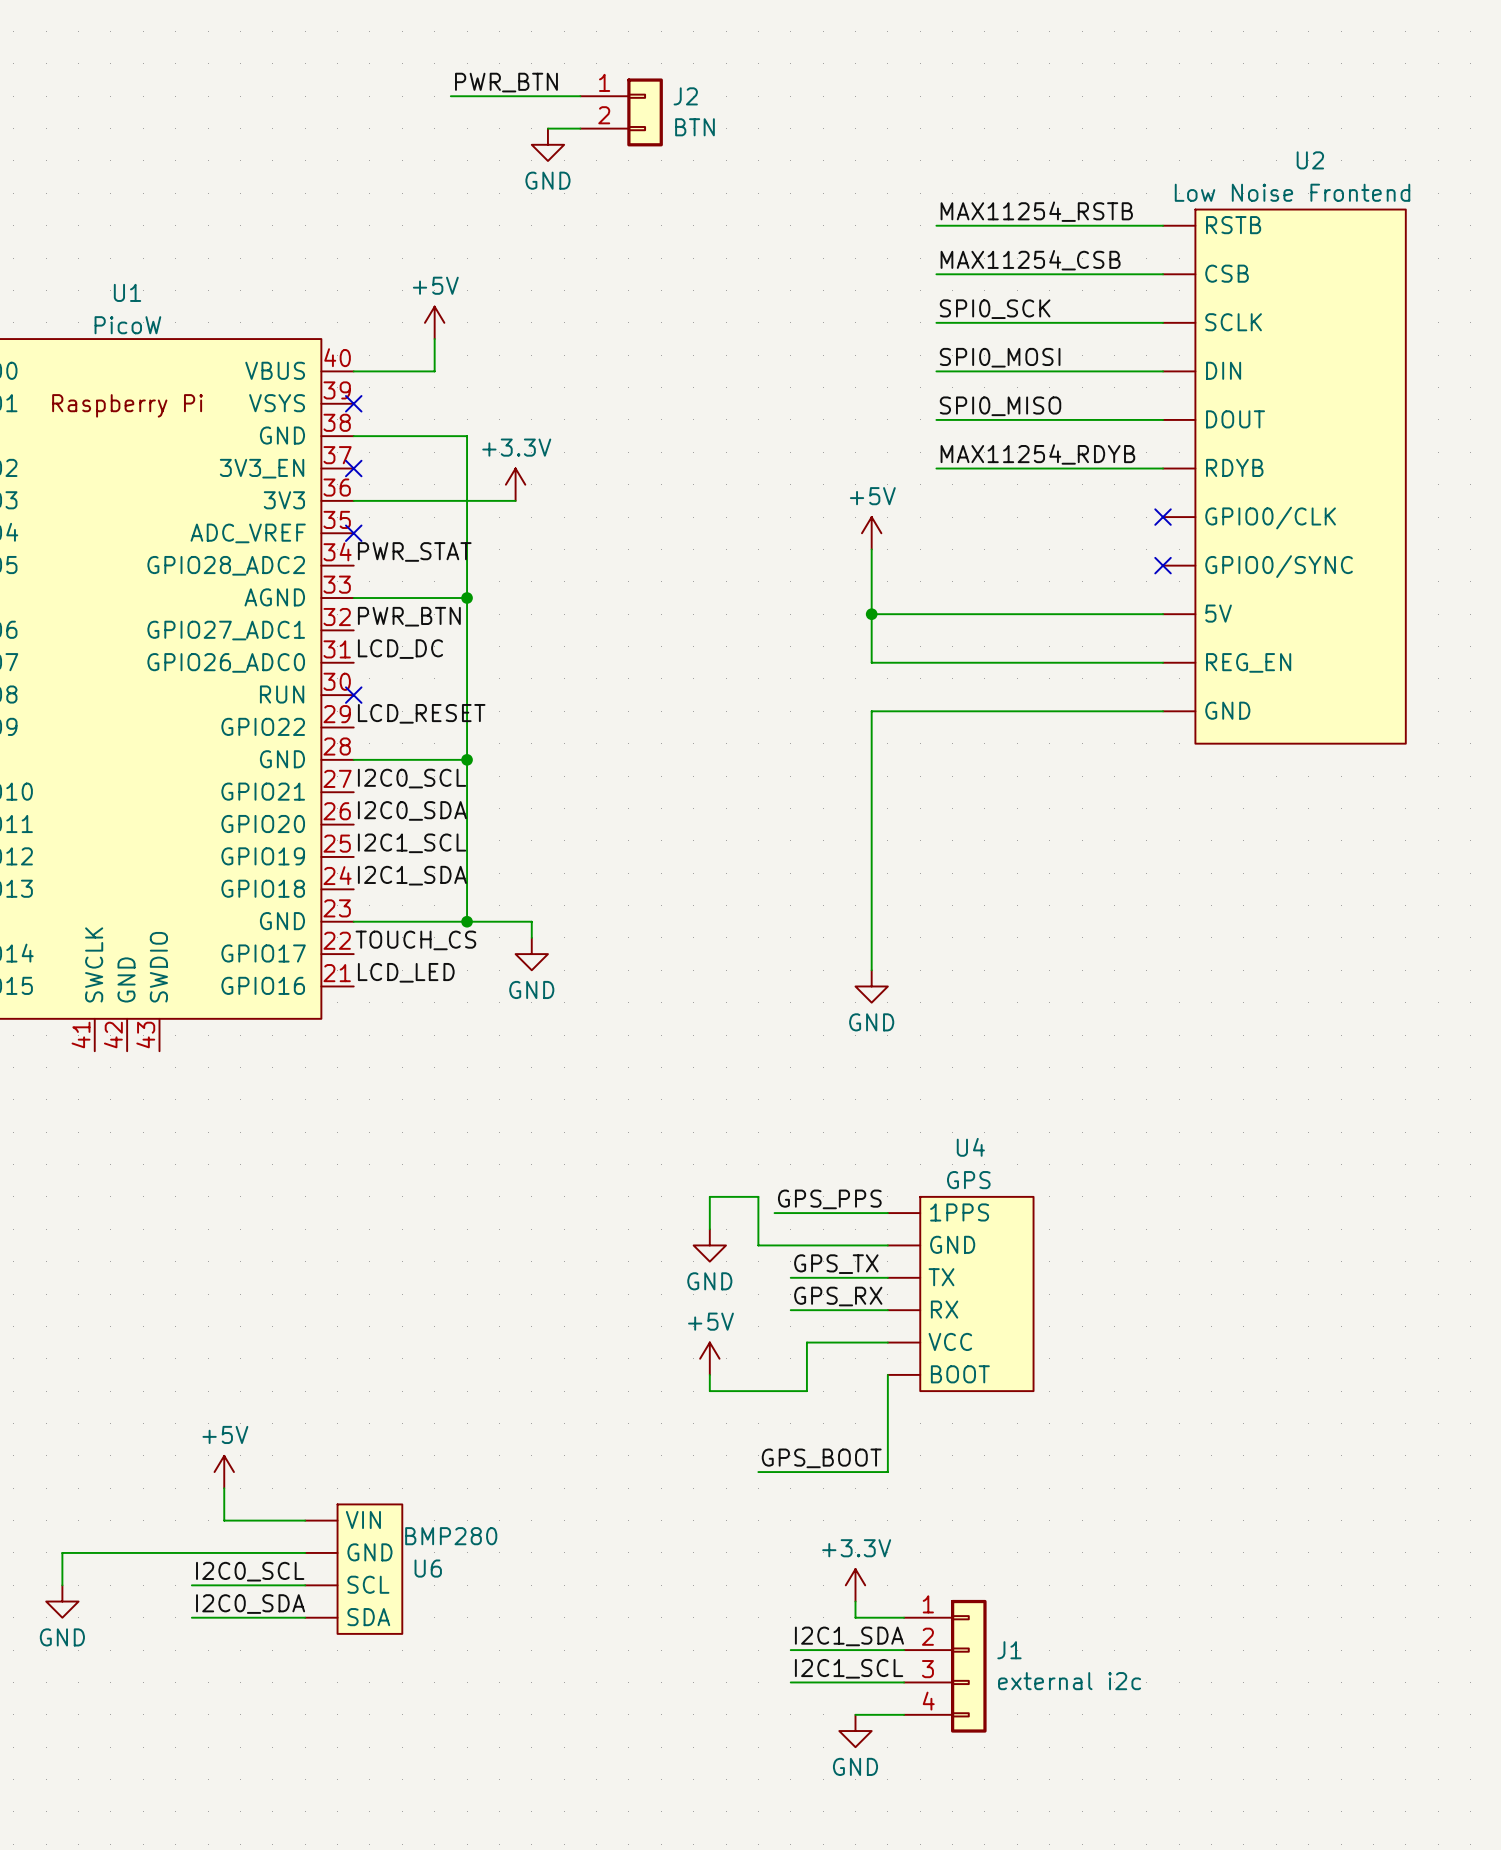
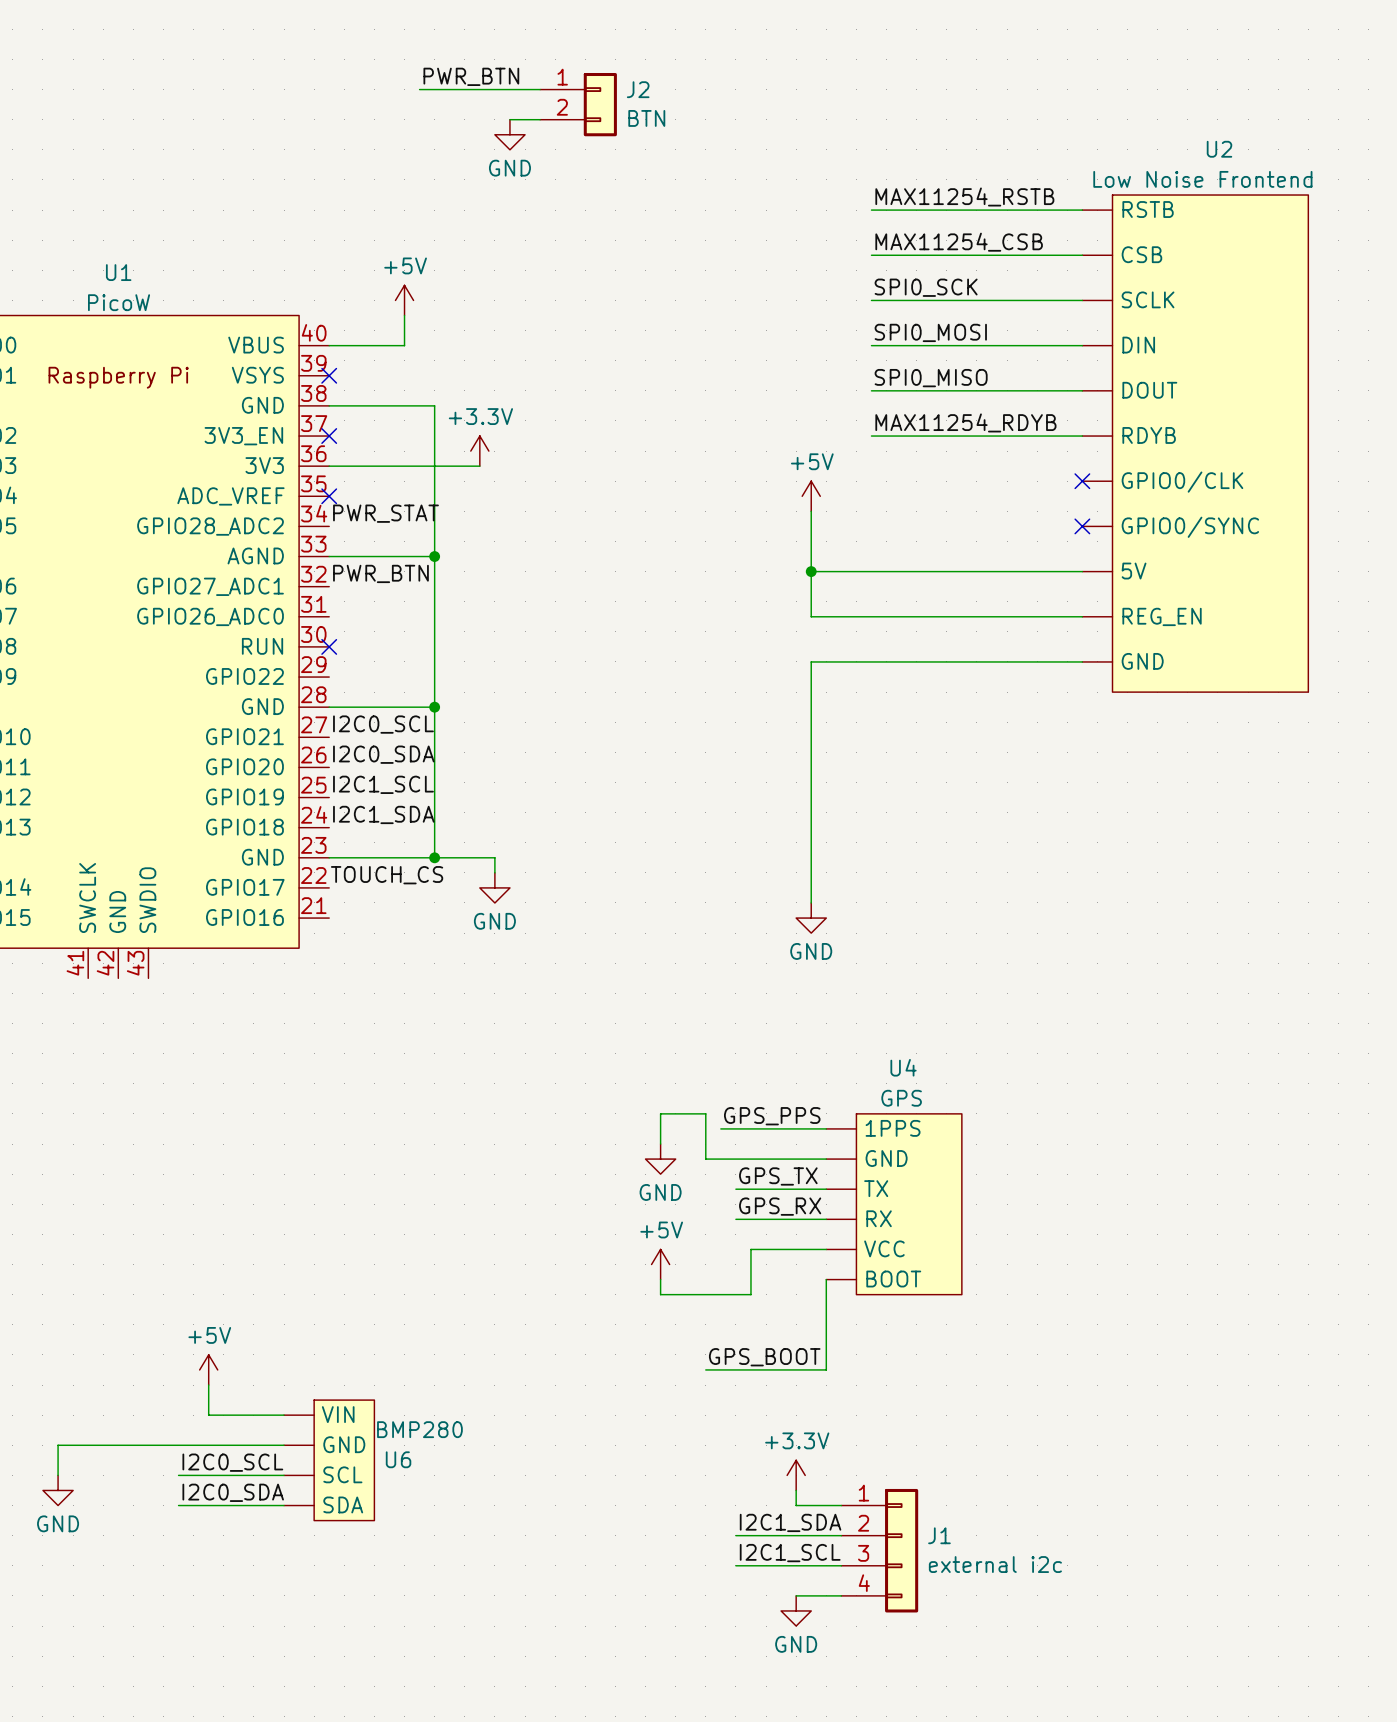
label: LCD_DC (400, 649) -> none
label: LCD_RESET (421, 713) -> none
label: LCD_LED (406, 972) -> none

